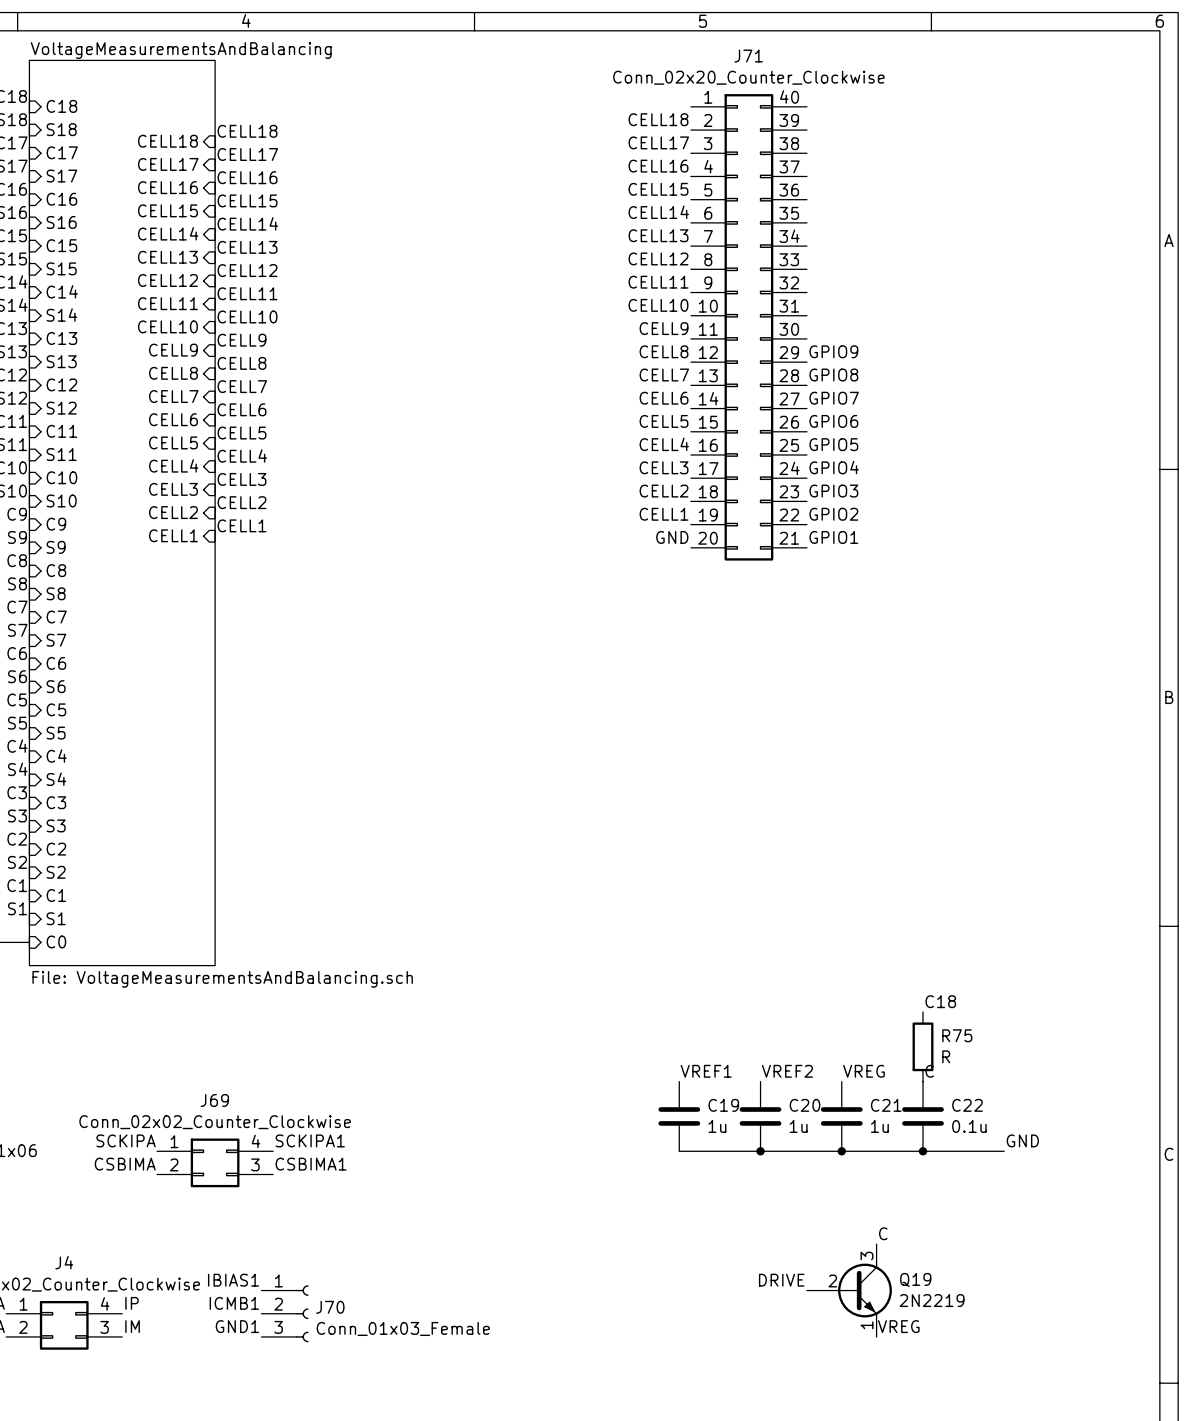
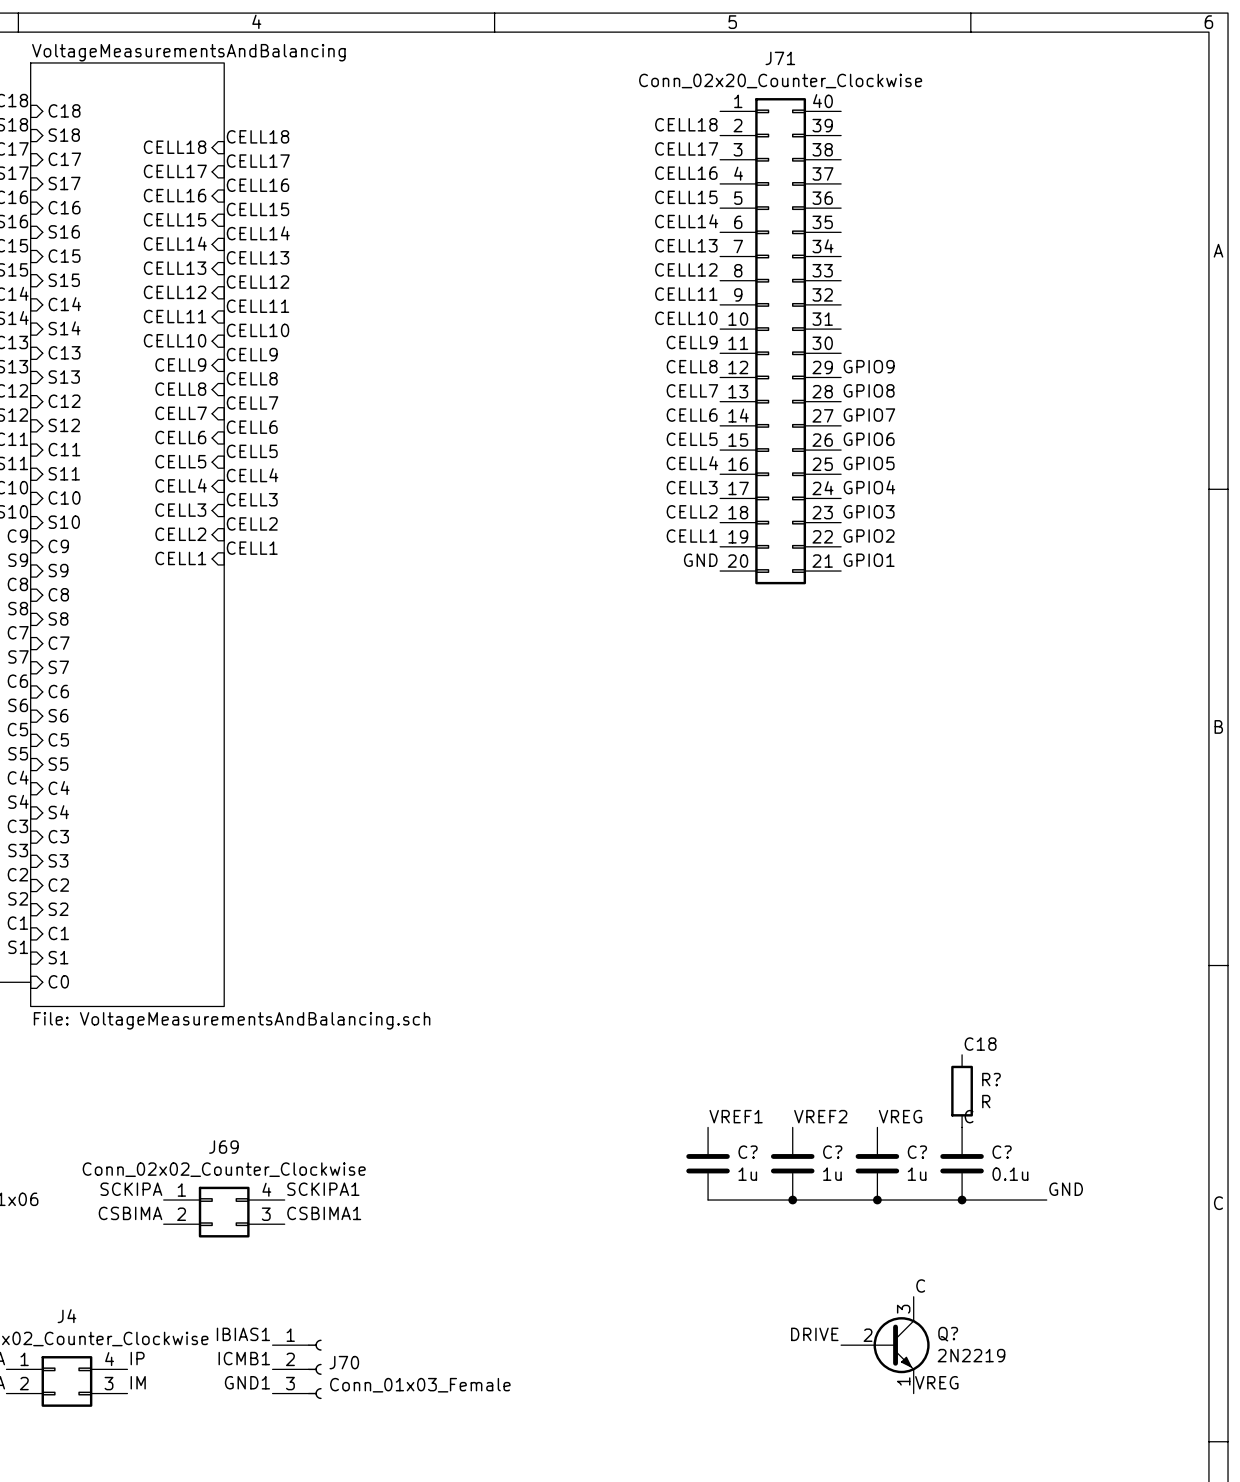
R75 name: R75 (957, 1035) -> R? (991, 1079)
C19 name: C19 (723, 1105) -> C? (748, 1152)
C20 name: C20 (804, 1105) -> C? (832, 1152)
C21 name: C21 (886, 1105) -> C? (917, 1152)
C22 name: C22 (967, 1105) -> C? (1002, 1152)
Q19 name: Q19 (915, 1279) -> Q? (948, 1334)

